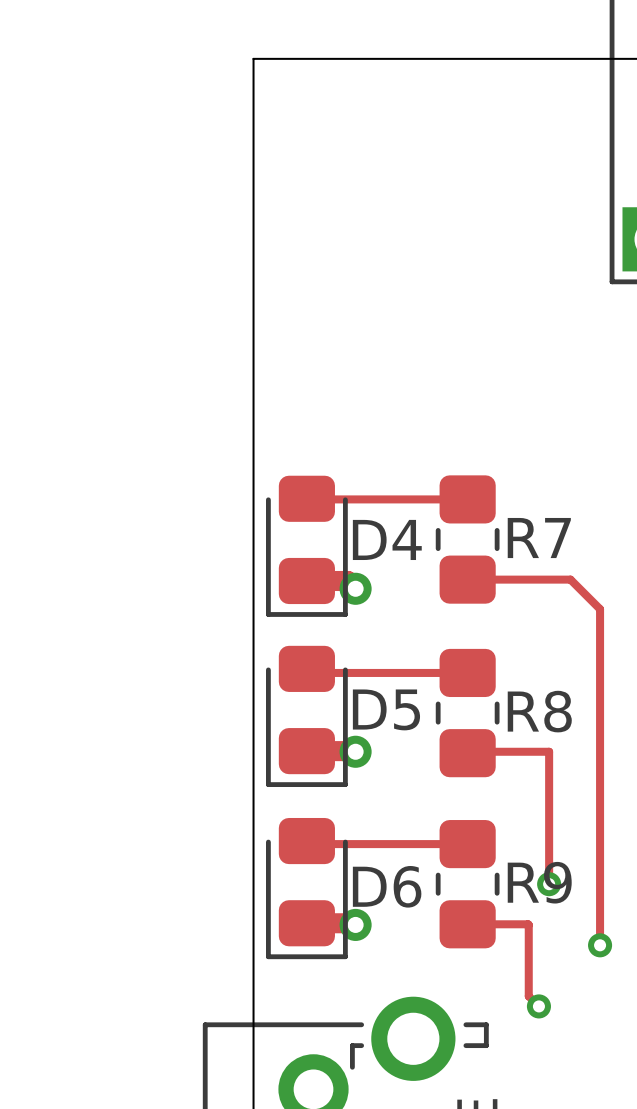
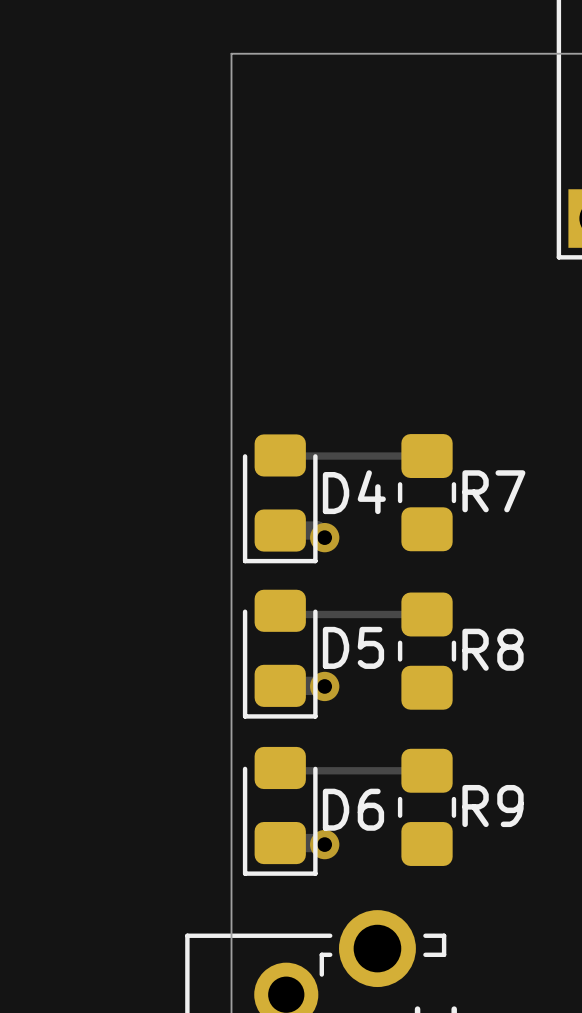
track: (467, 579) (570, 579) (600, 609) (600, 945) -> none
track: (467, 753) (549, 751) (549, 884) -> none
via: (549, 884) -> none
track: (467, 924) (528, 924) (528, 996) (538, 1006) -> none
via: (600, 945) -> none
via: (538, 1006) -> none

